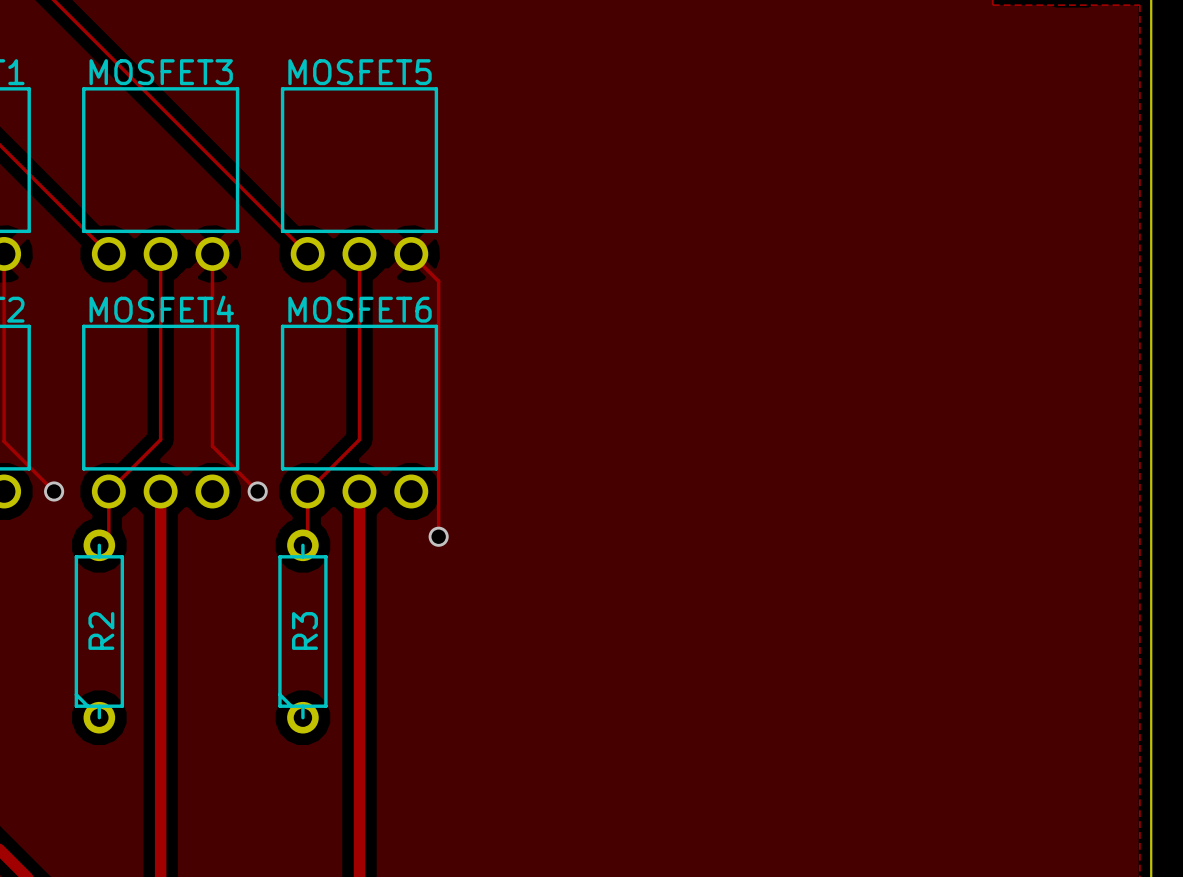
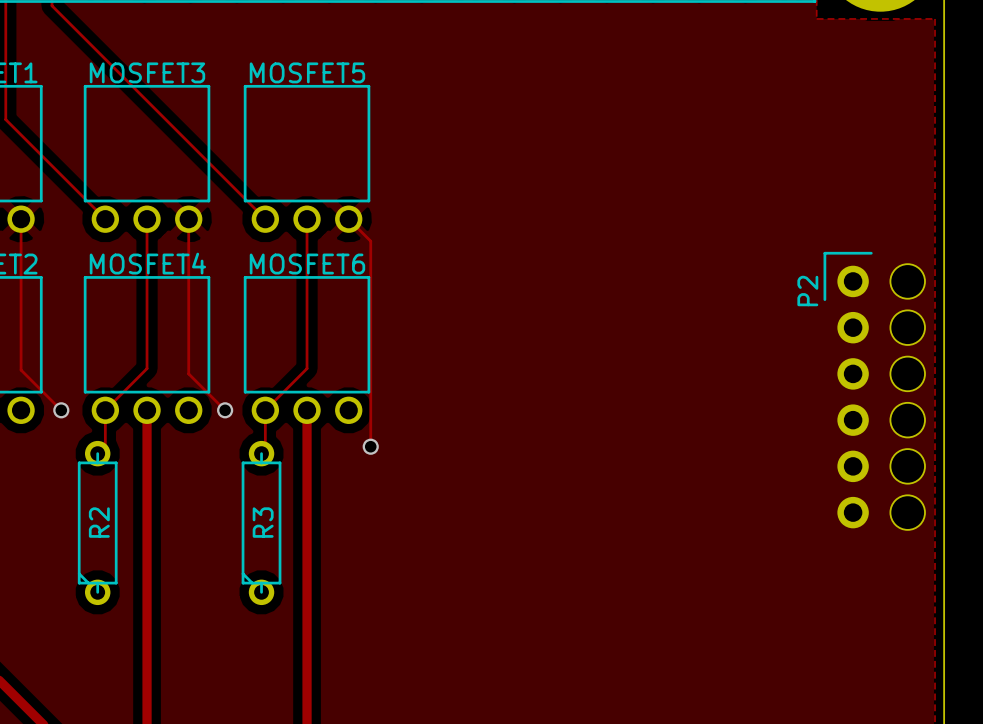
P2: none -> (874, 391)

